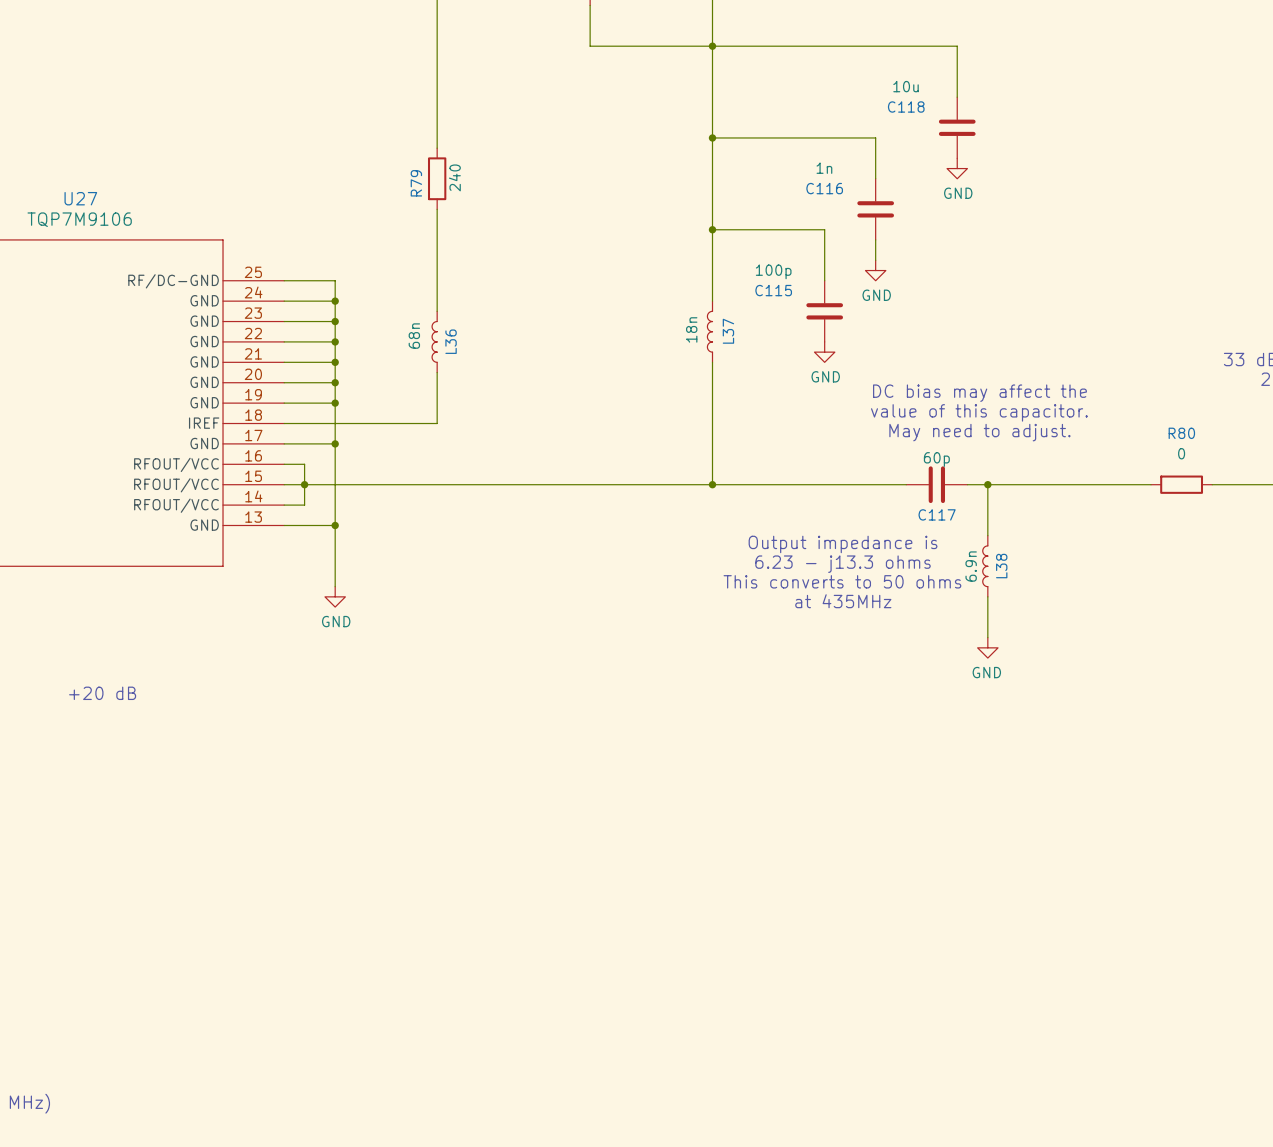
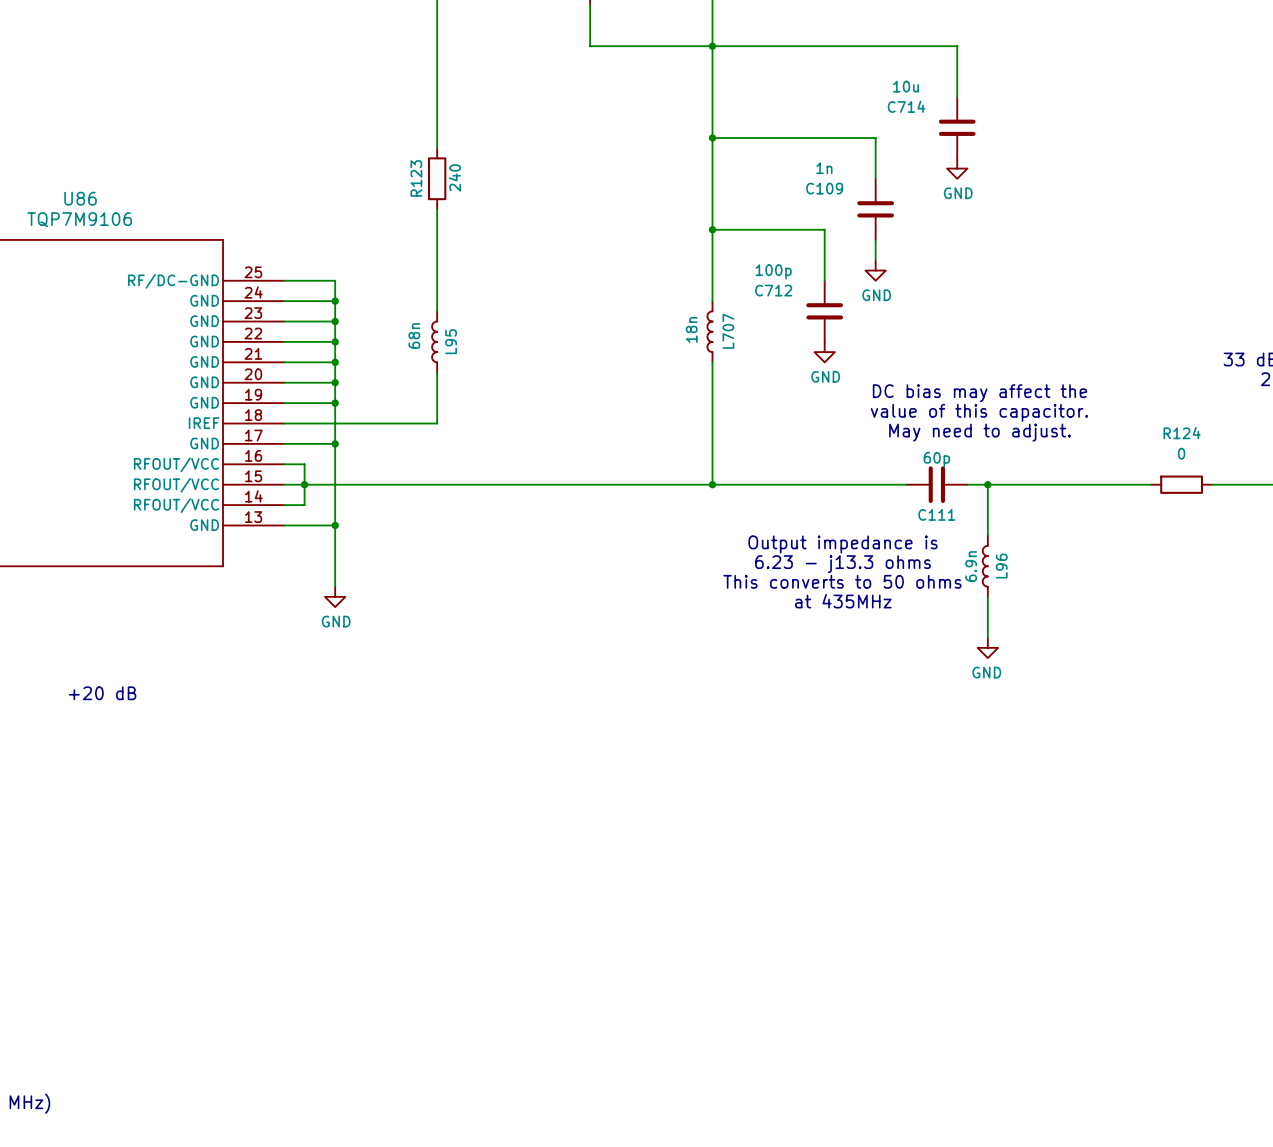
C118 name: C118 (906, 107) -> C714 (906, 106)
R79 name: R79 (416, 183) -> R123 (416, 178)
C116 name: C116 (824, 188) -> C109 (824, 188)
U27 name: U27 (80, 198) -> U86 (80, 198)
C115 name: C115 (773, 290) -> C712 (773, 290)
L37 name: L37 (728, 331) -> L707 (728, 331)
L36 name: L36 (451, 341) -> L95 (451, 341)
R80 name: R80 (1181, 433) -> R124 (1182, 433)
C117 name: C117 (937, 514) -> C111 (936, 514)
L38 name: L38 (1001, 566) -> L96 (1001, 566)

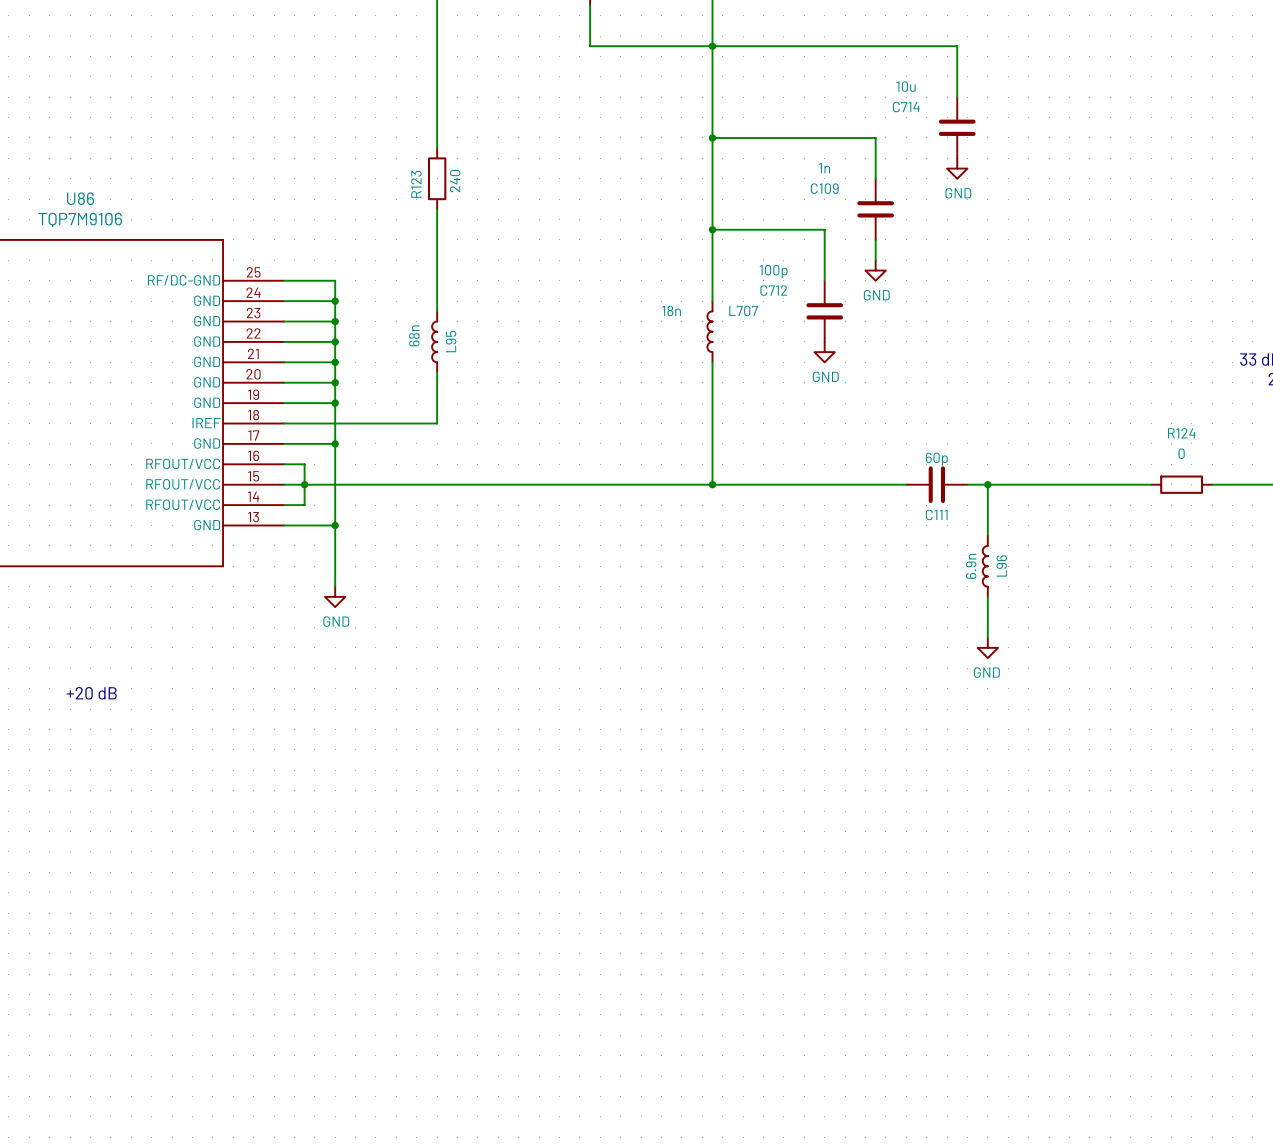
L707 value rotation: 0° (691, 329) -> 90° clockwise (671, 310)
L707 name rotation: 0° (728, 331) -> 90° clockwise (743, 310)
text: DC bias may affect the (979, 393) -> none
text: value of this capacitor. (979, 412) -> none
text: May need to adjust. (979, 432) -> none
text: Output impedance is (843, 544) -> none
text: 6.23 - j13.3 ohms (843, 564) -> none
text: This converts to 50 ohms (842, 581) -> none
text: at 435MHz (843, 601) -> none

